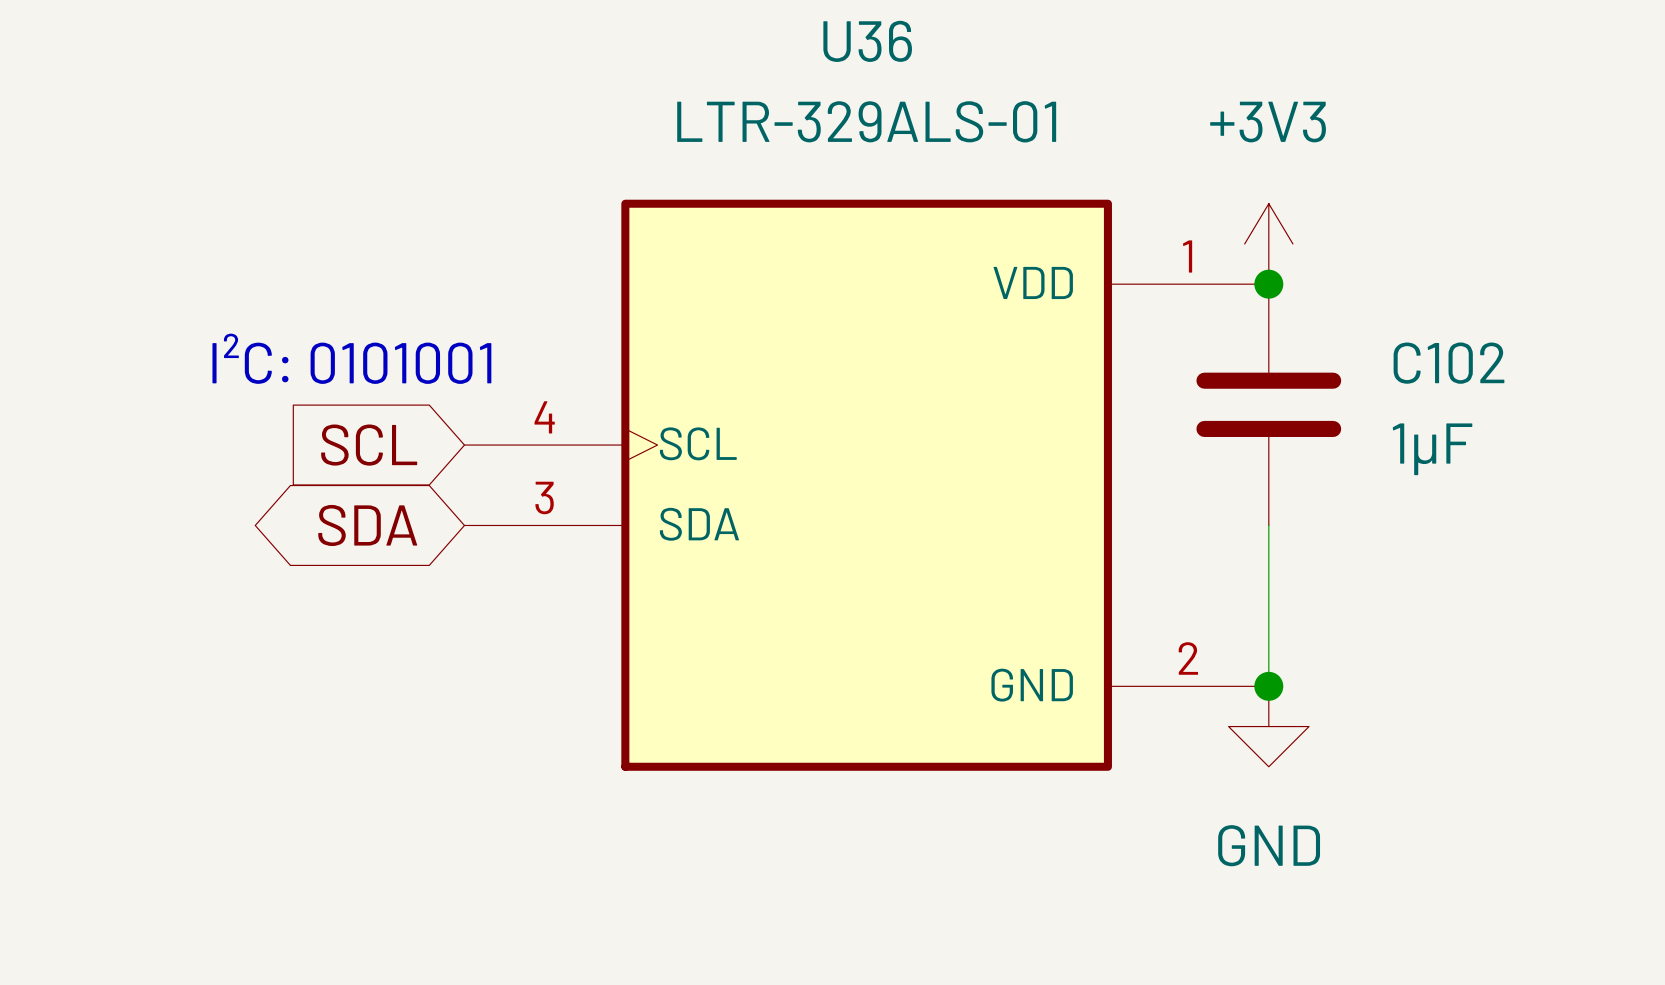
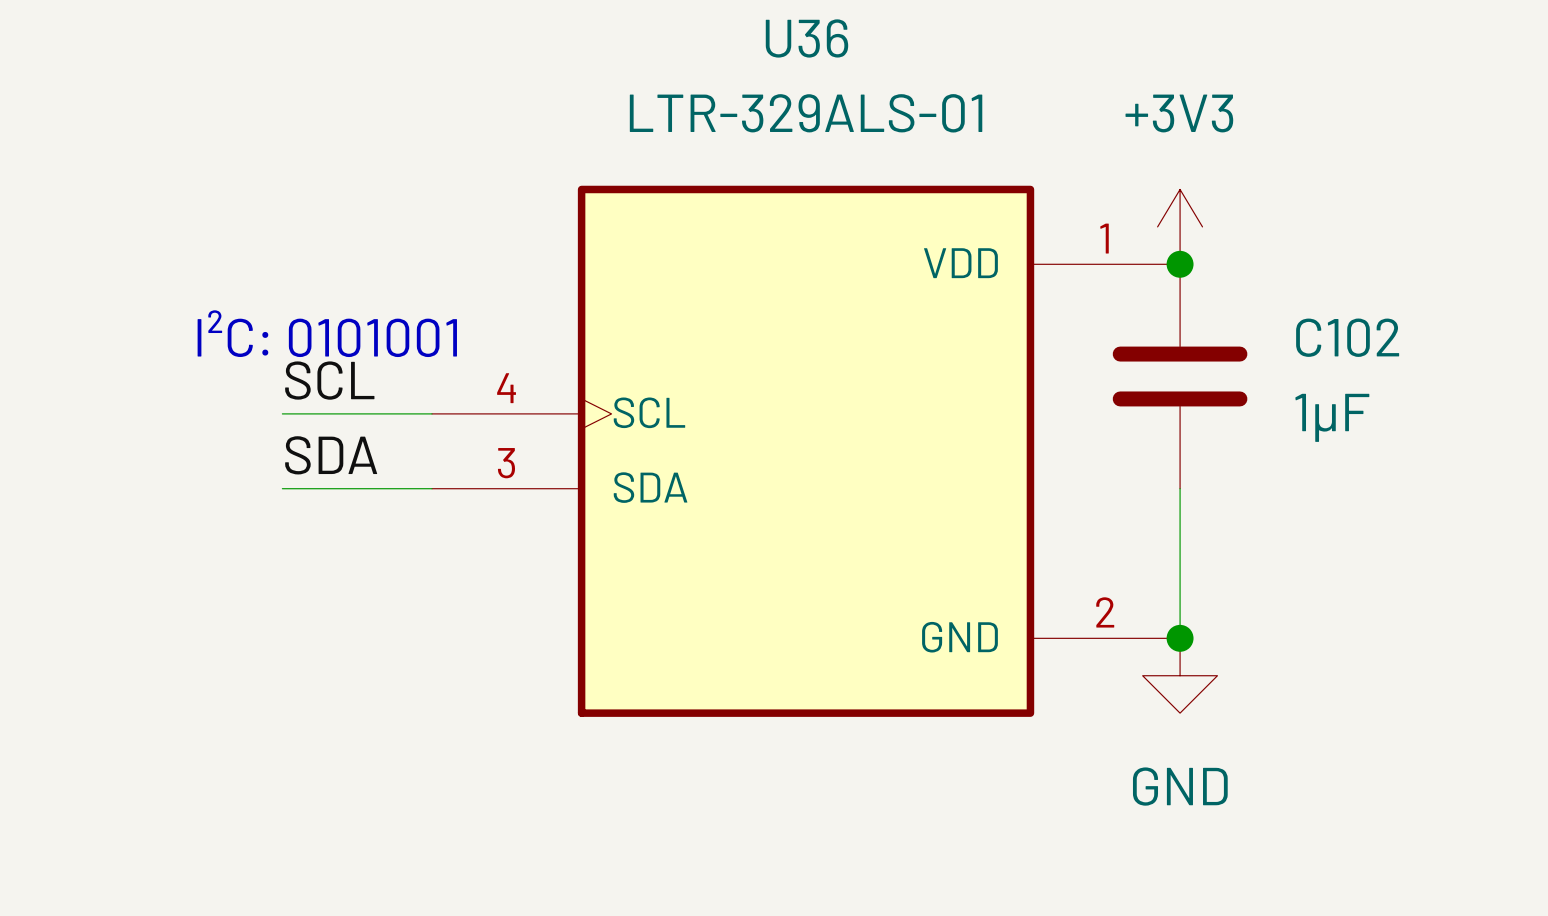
label: none -> SCL (329, 380)
wire: none -> (282, 413) (431, 413)
global label: SCL (369, 445) -> none
label: none -> SDA (331, 455)
wire: none -> (282, 488) (431, 488)
global label: SDA (367, 525) -> none

